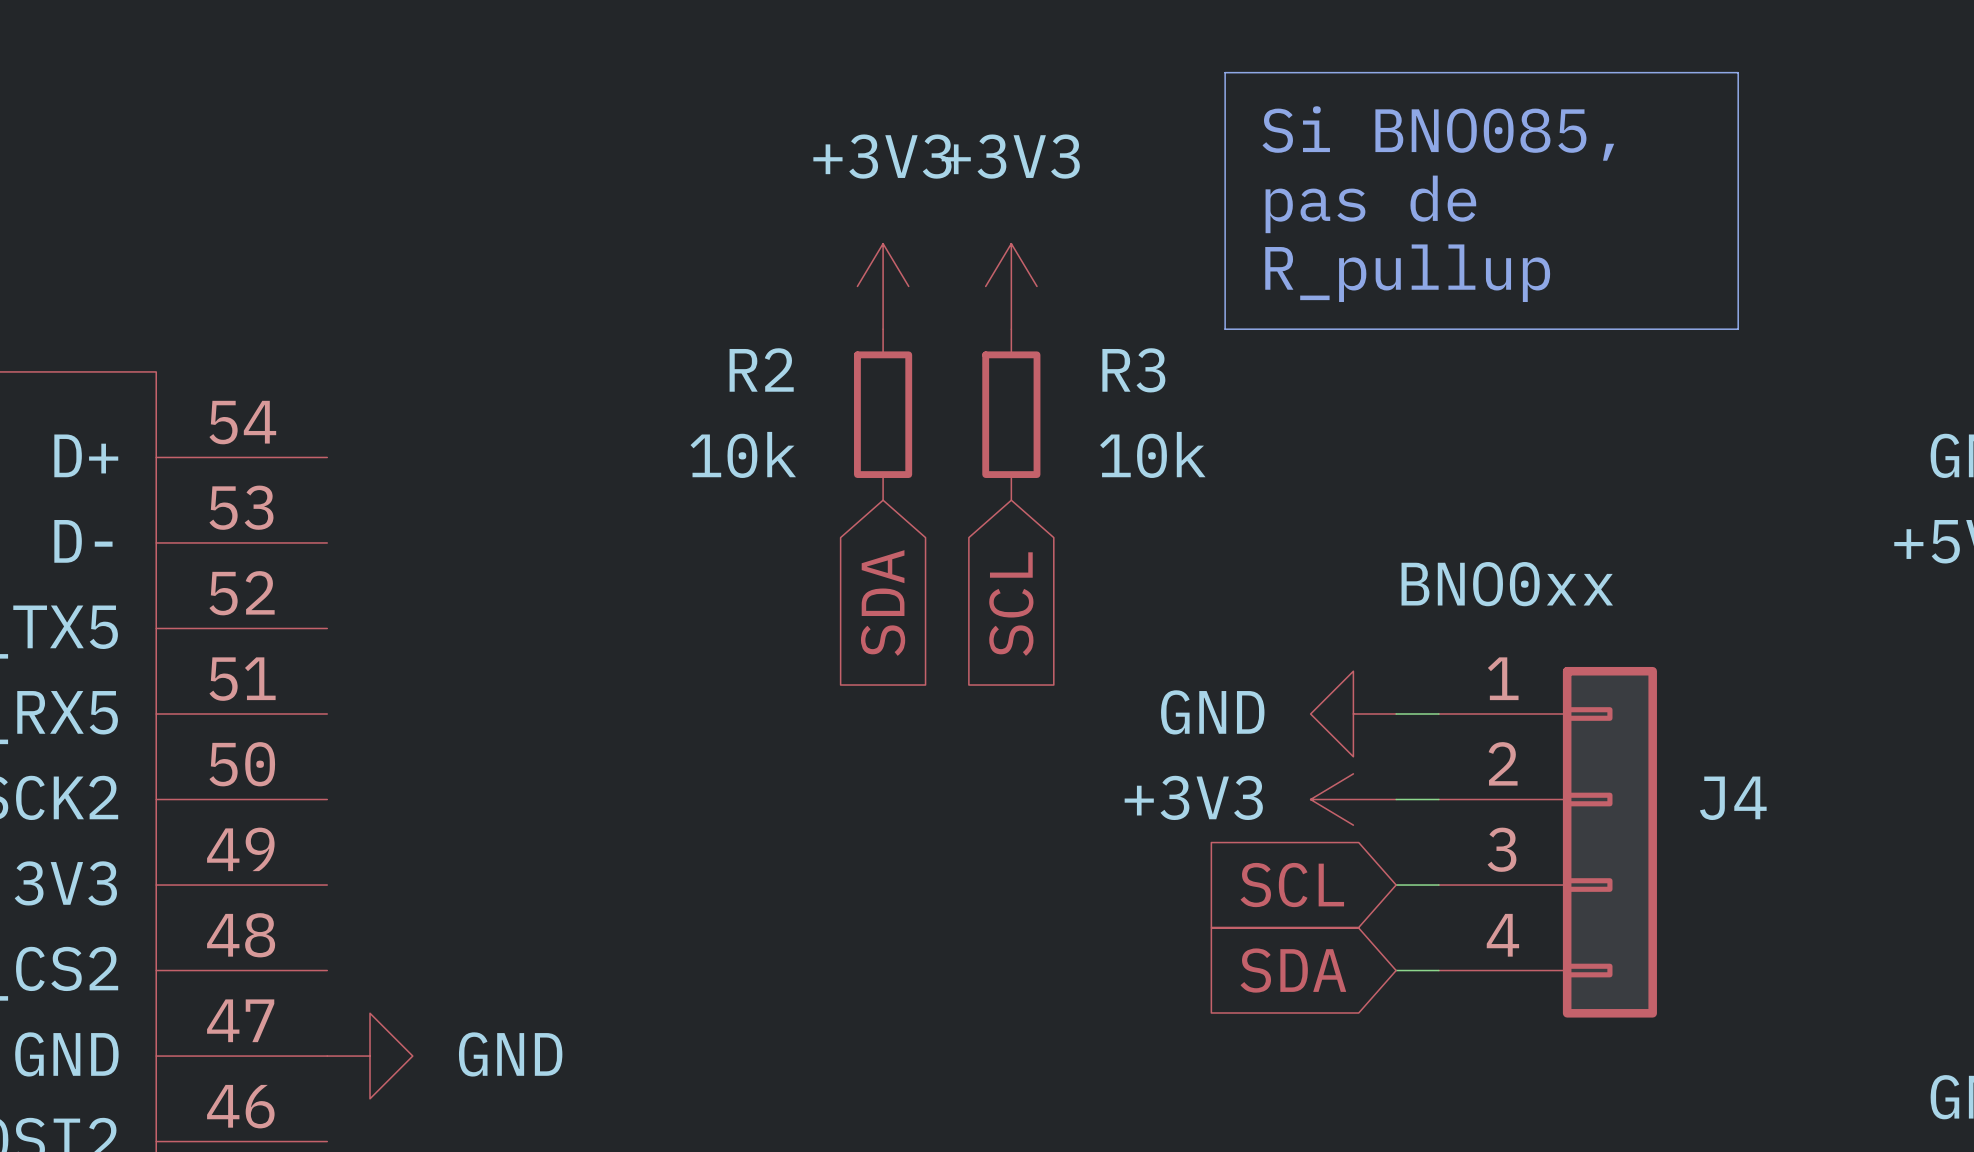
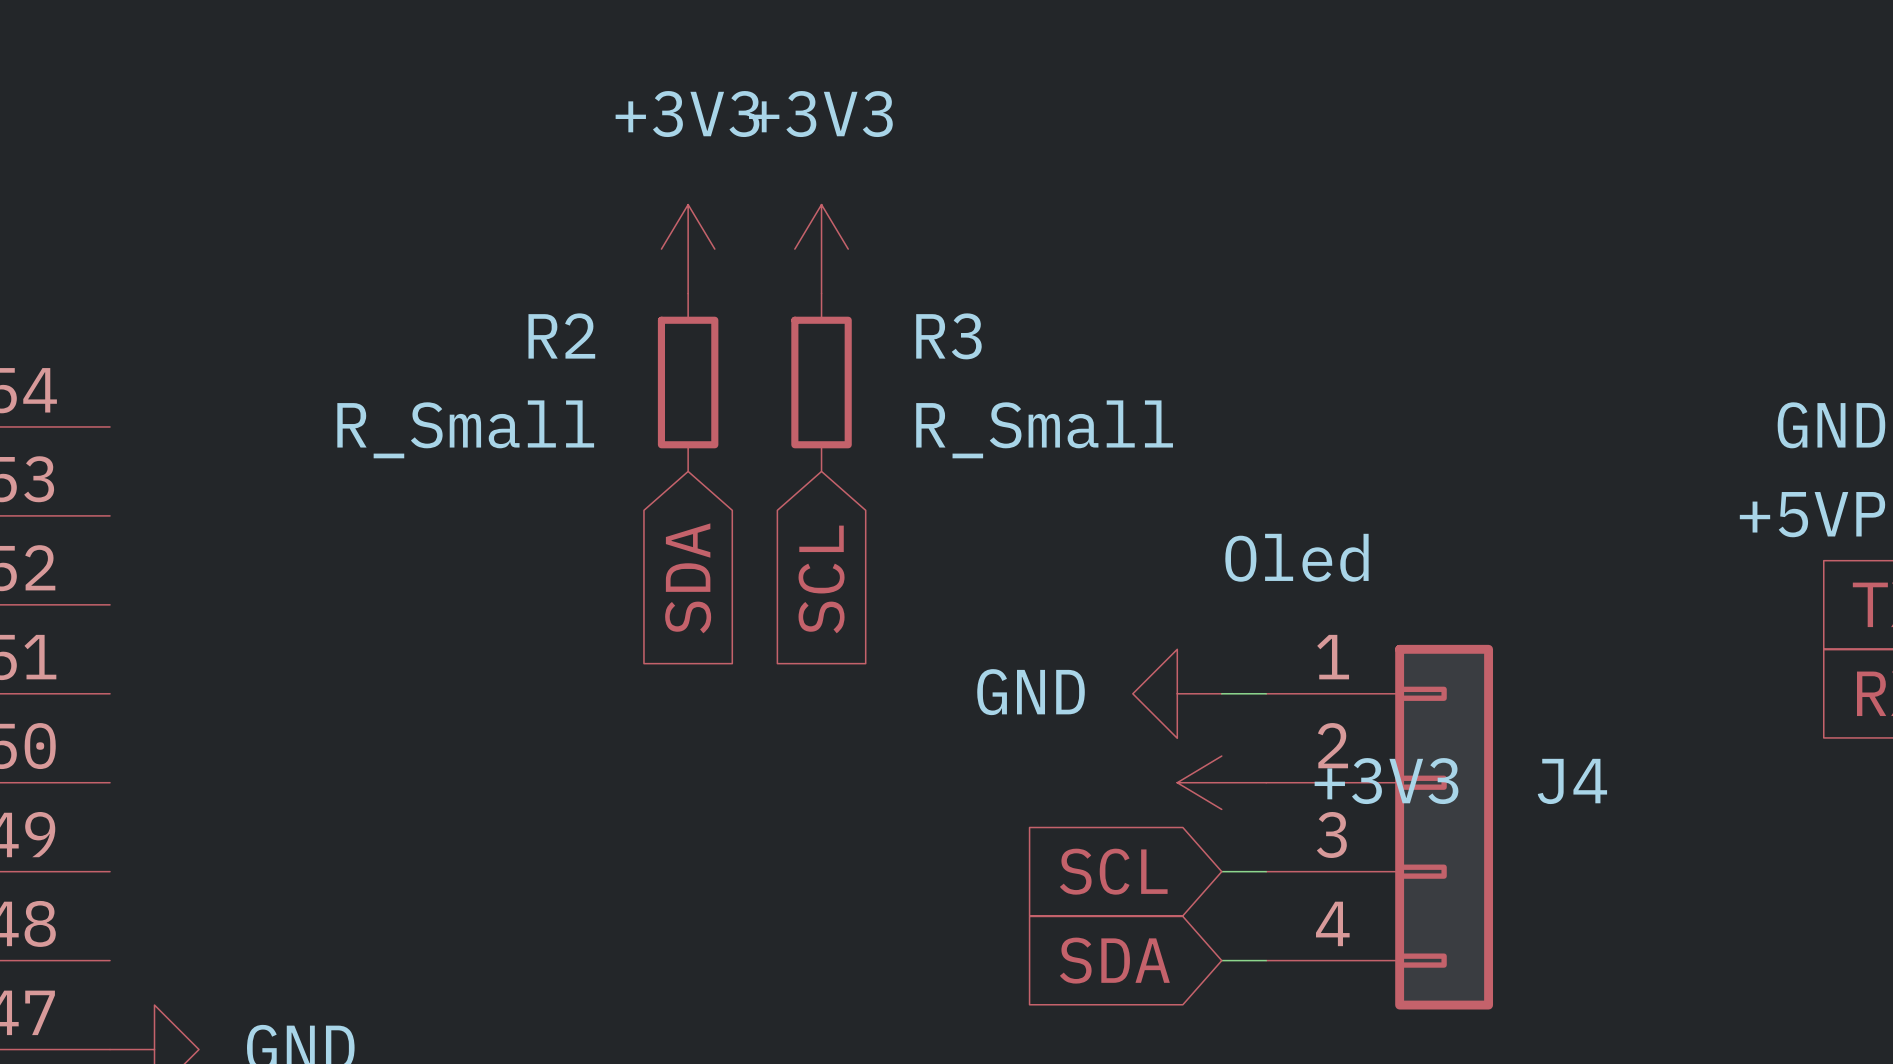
line: (1225, 72) (1738, 72) (1738, 329) (1225, 329) (1225, 72) -> none
text: Si BNO085, (1438, 133) -> none
text: pas de (1370, 204) -> none
text: R_pullup (1407, 273) -> none
R2 value: 10k (743, 454) -> R_Small (465, 429)
R3 value: 10k (1152, 454) -> R_Small (1044, 429)
J4 value: BNO0xx (1507, 584) -> Oled (1296, 557)
power symbol text position: +3V3 (1193, 797) -> +3V3 (1386, 781)
power symbol position: +3V3 (1353, 799) -> +3V3 (1221, 782)

